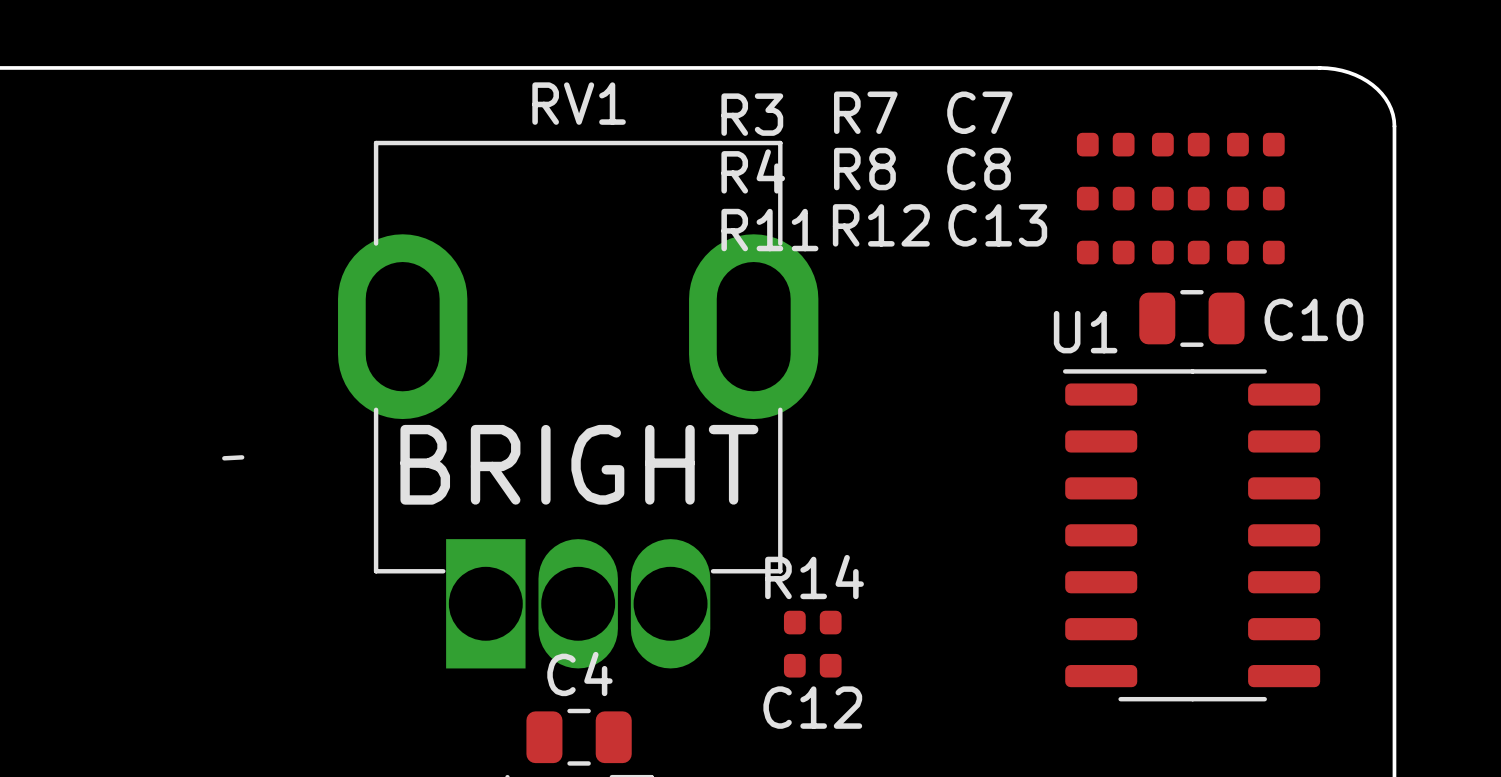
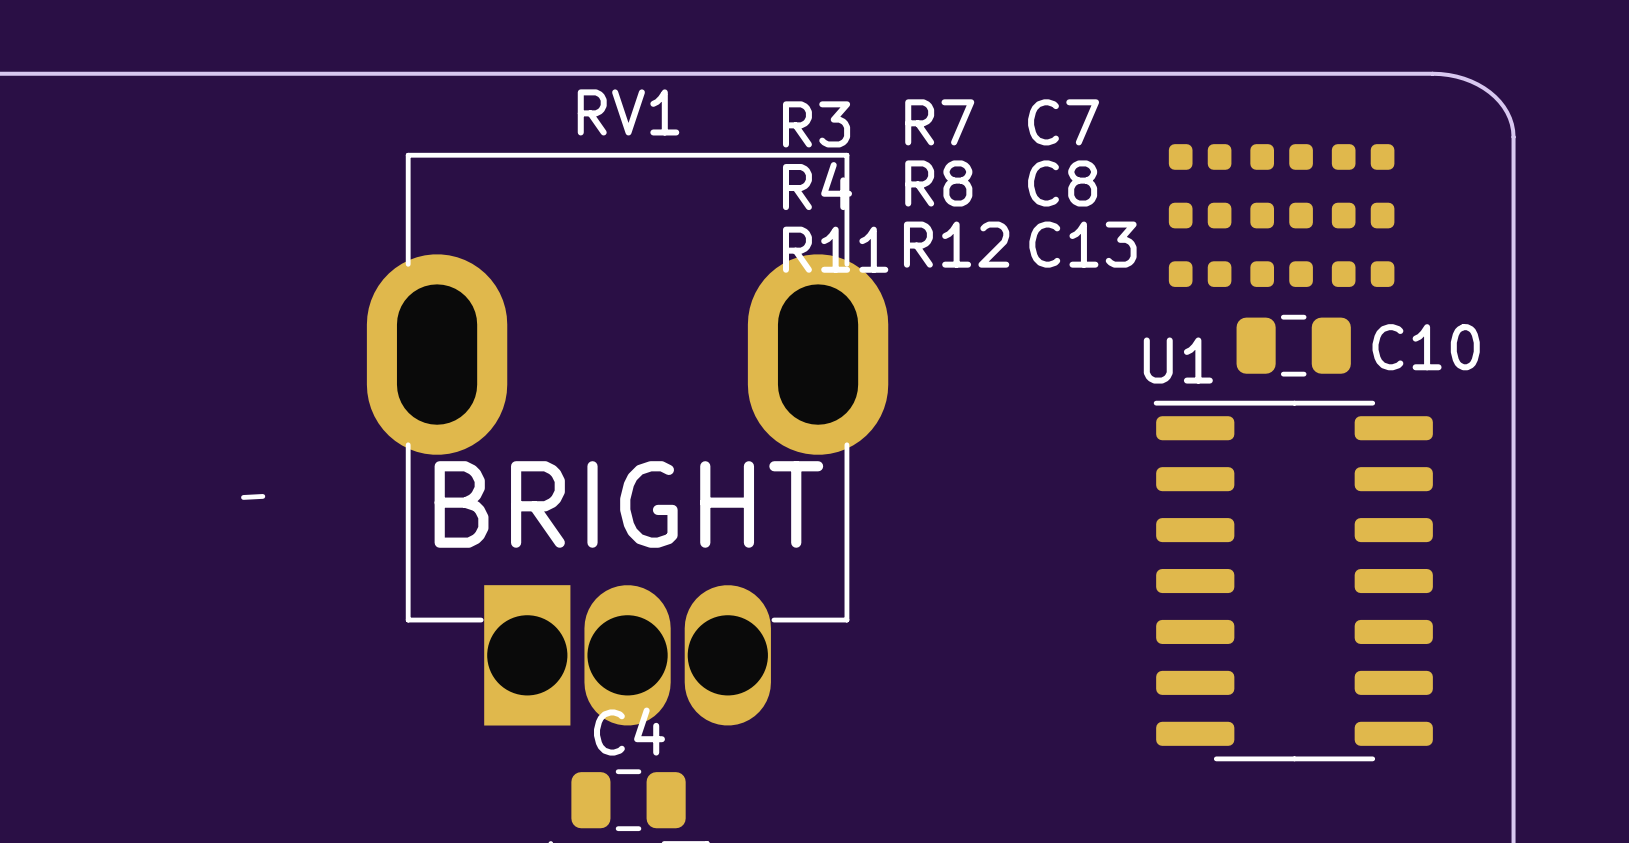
R14: (812, 622) -> none
C12: (812, 665) -> none

